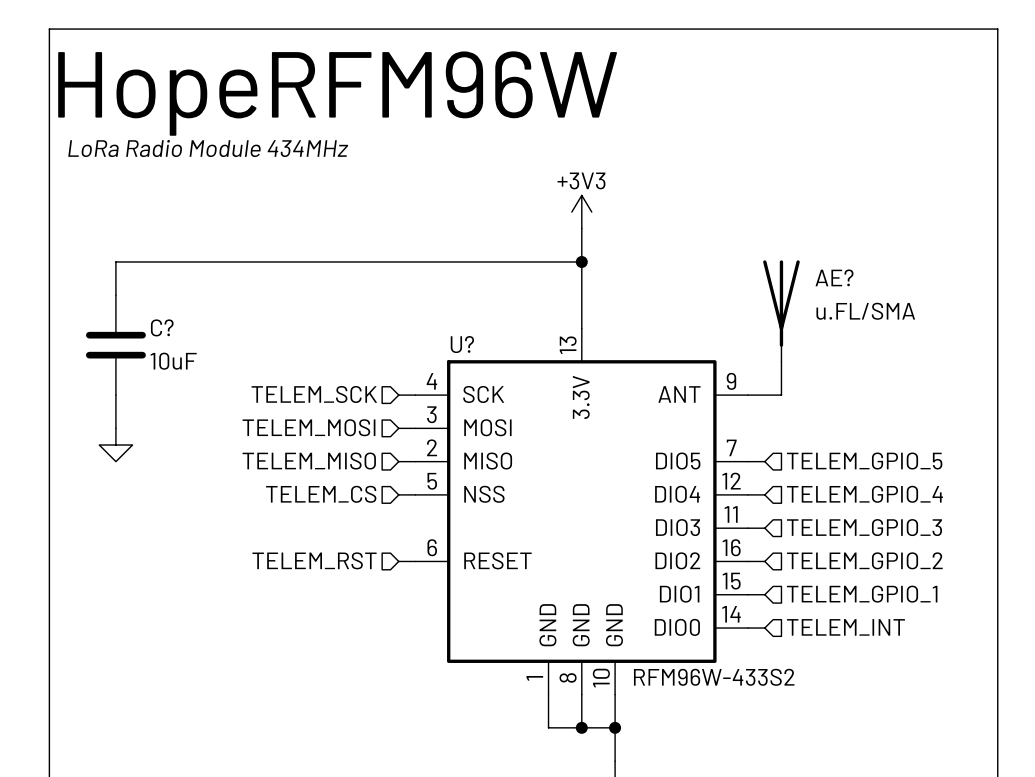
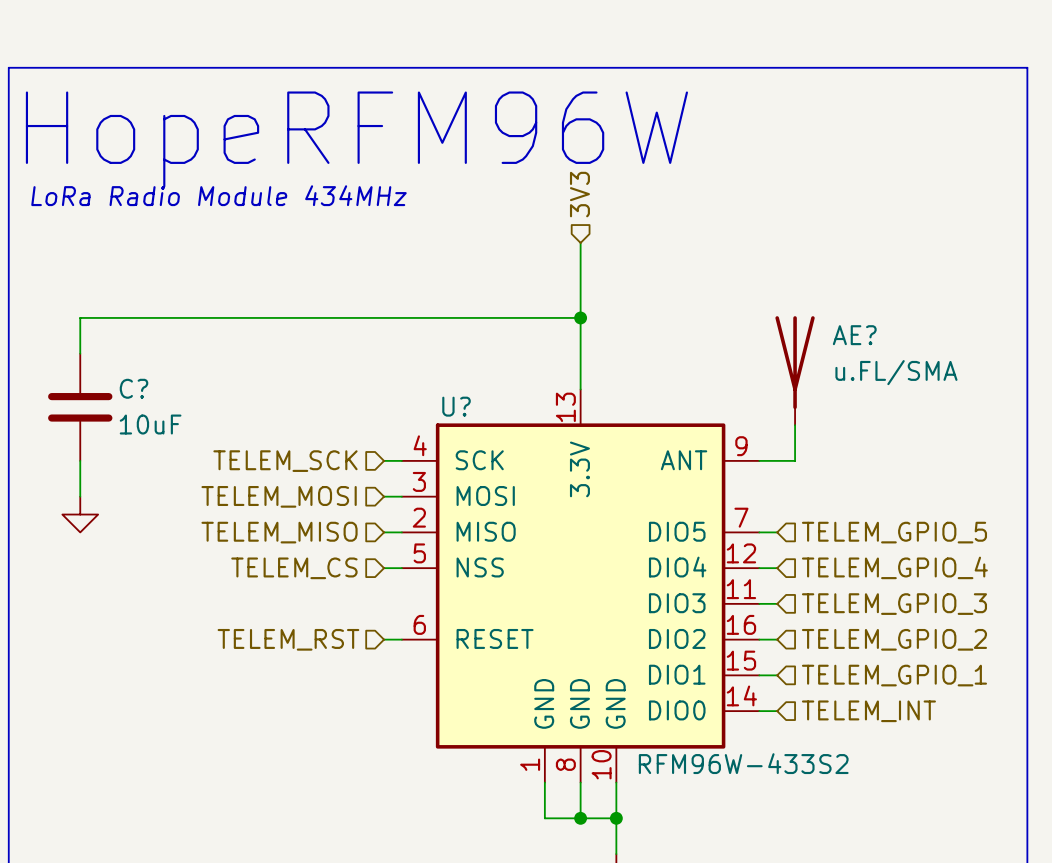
hierarchical label: none -> 3V3 (579, 194)
power symbol: +3V3 (581, 212) -> none

